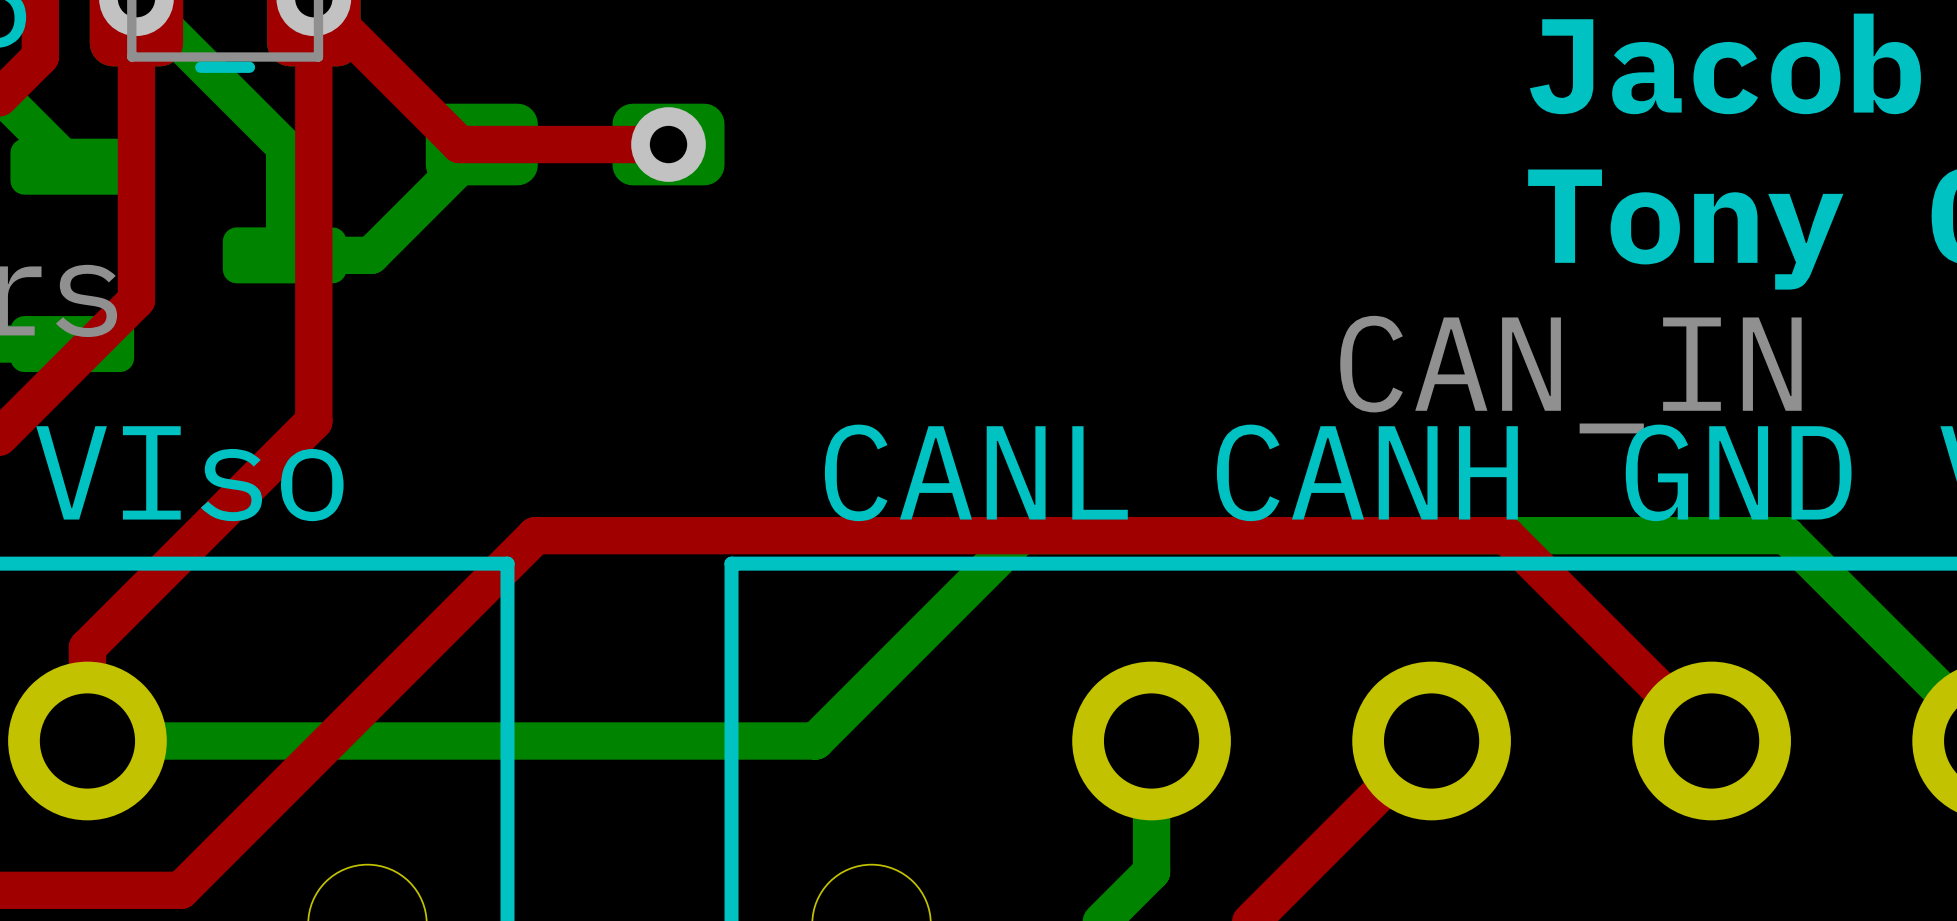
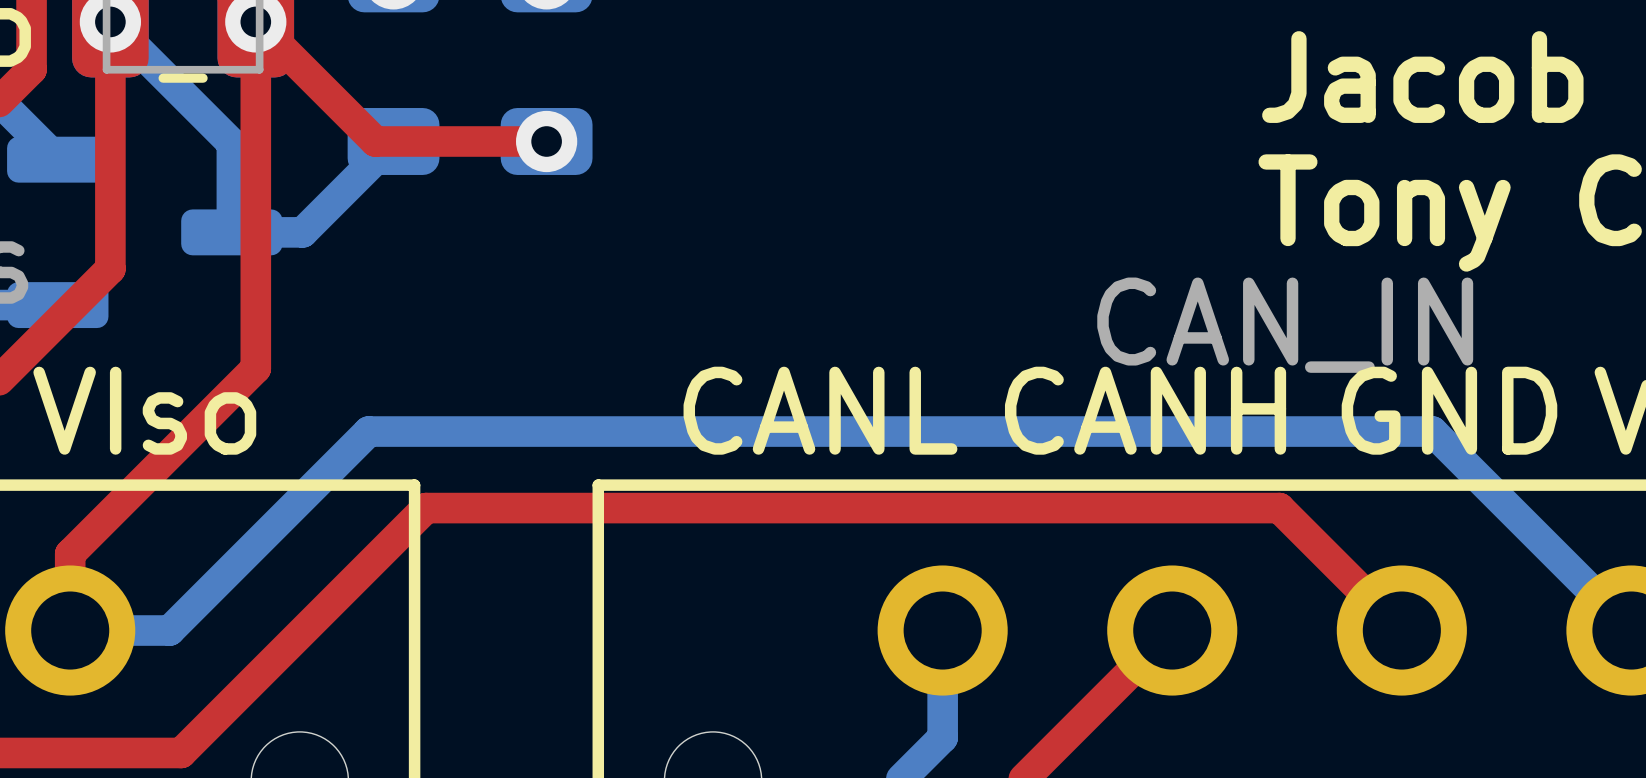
bottom track: (1786, 535) (1020, 535) (815, 740) (208, 740) -> (1463, 462) (1432, 431) (368, 431) (169, 630)
top track: (1562, 591) (1506, 535) (535, 535) (180, 890) -> (1279, 508) (426, 508) (181, 752) (146, 752)

